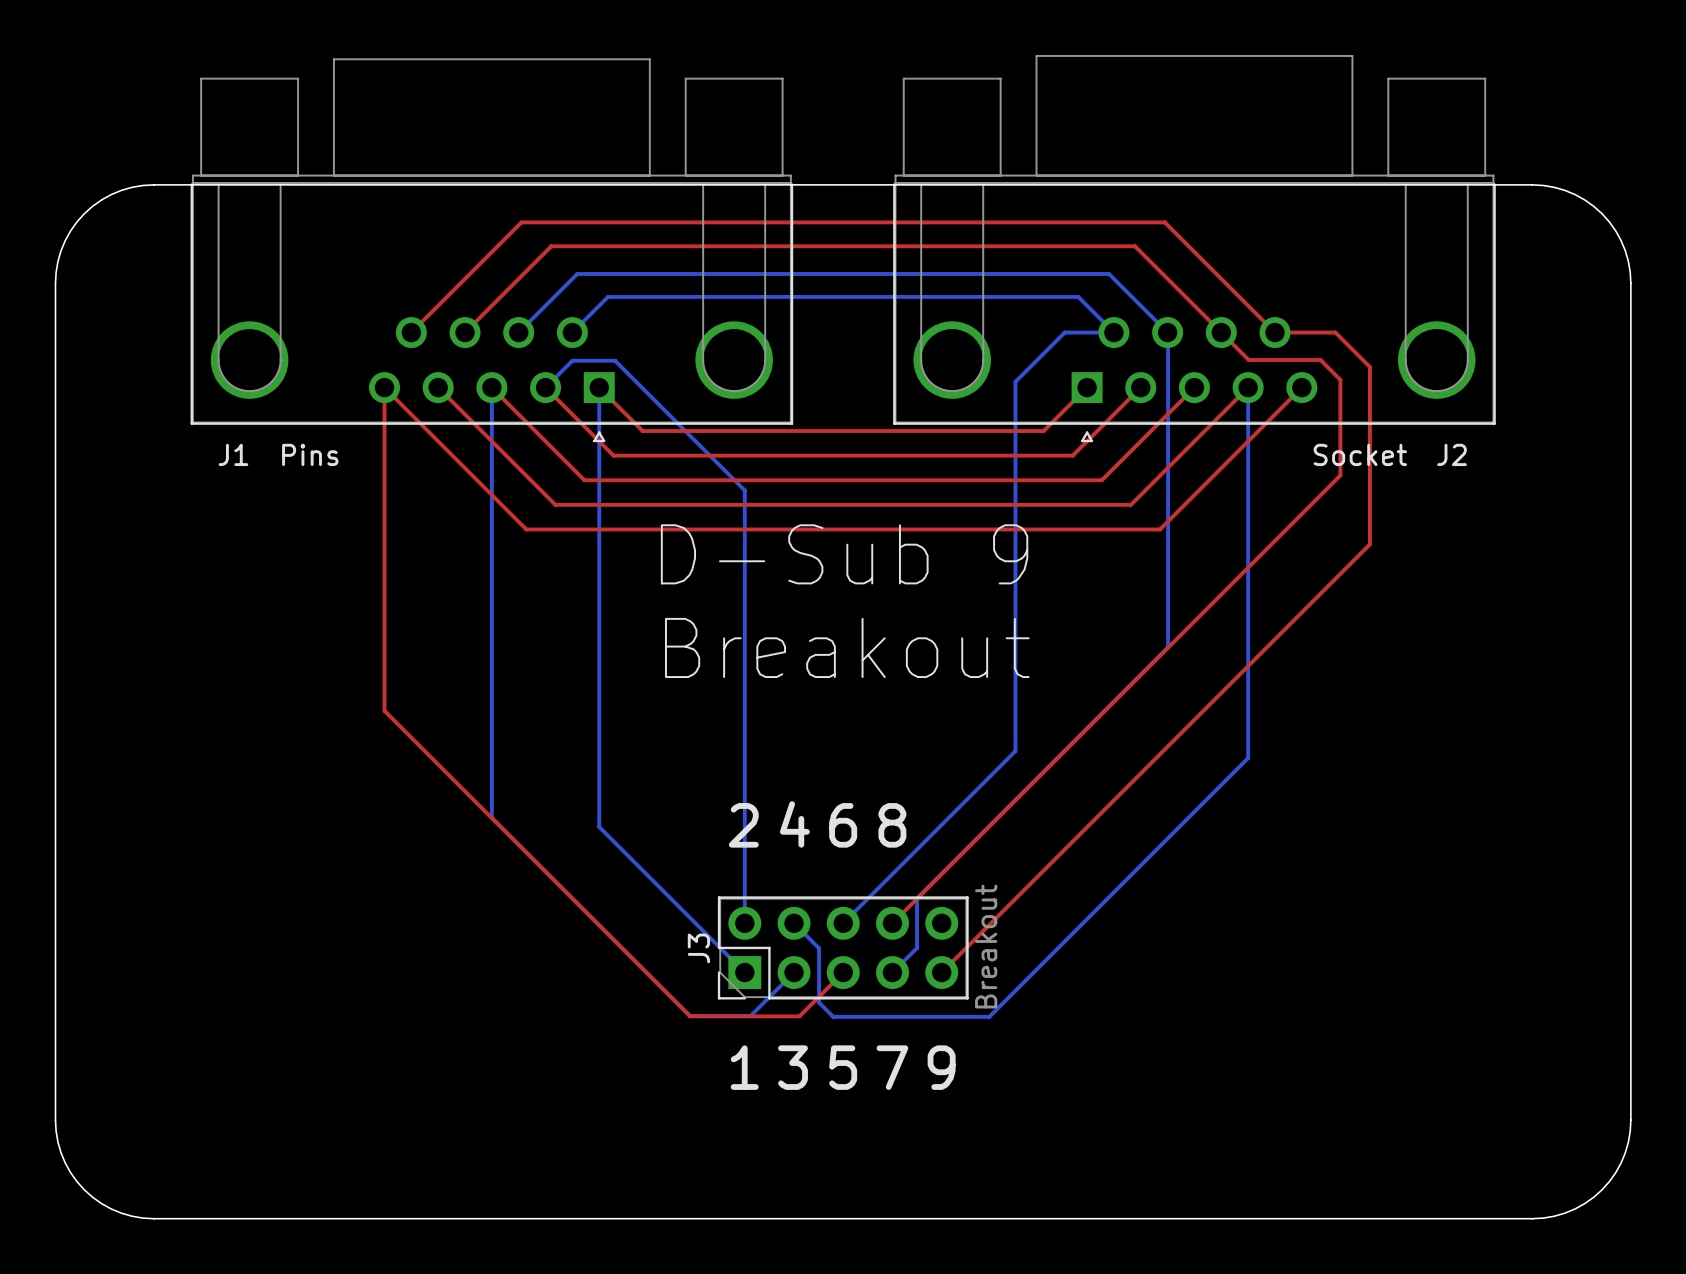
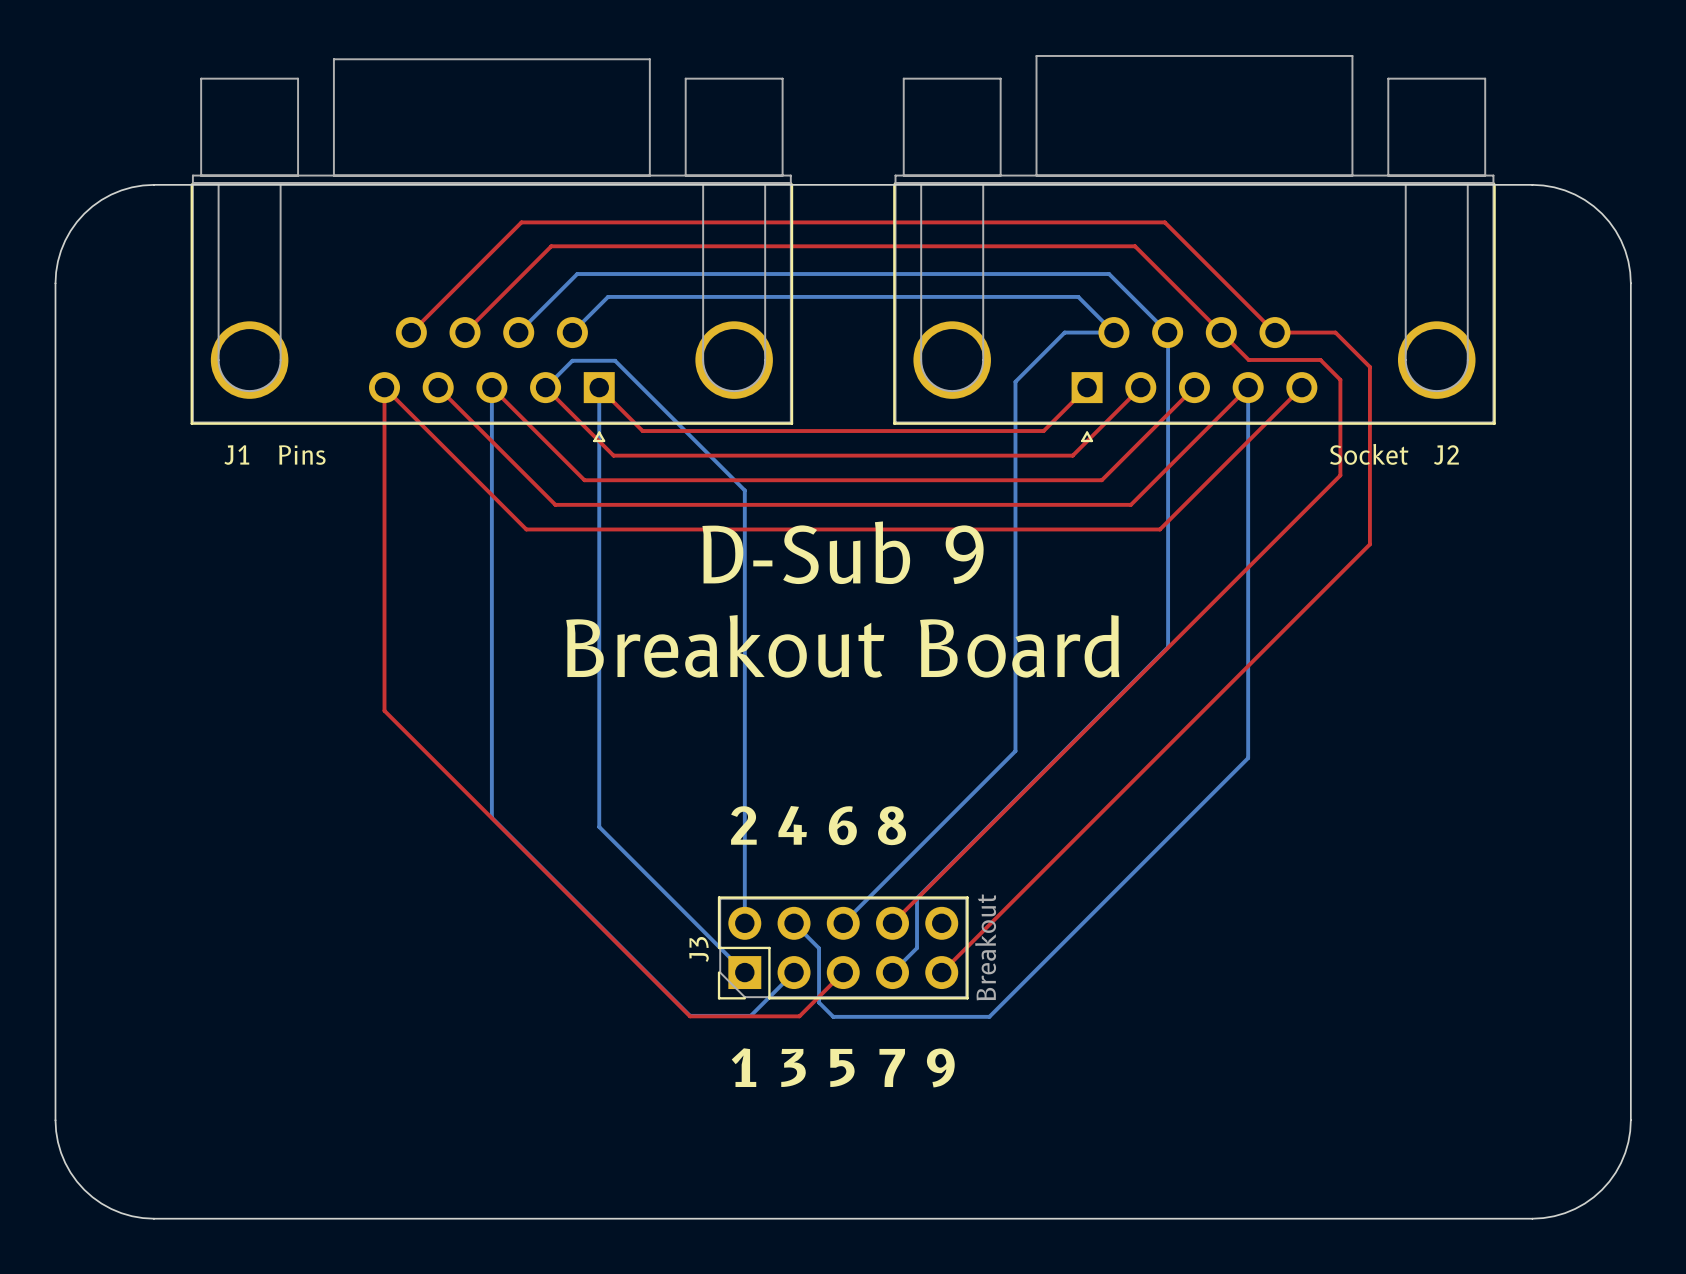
text: Breakout (847, 647) -> Breakout Board (842, 646)

